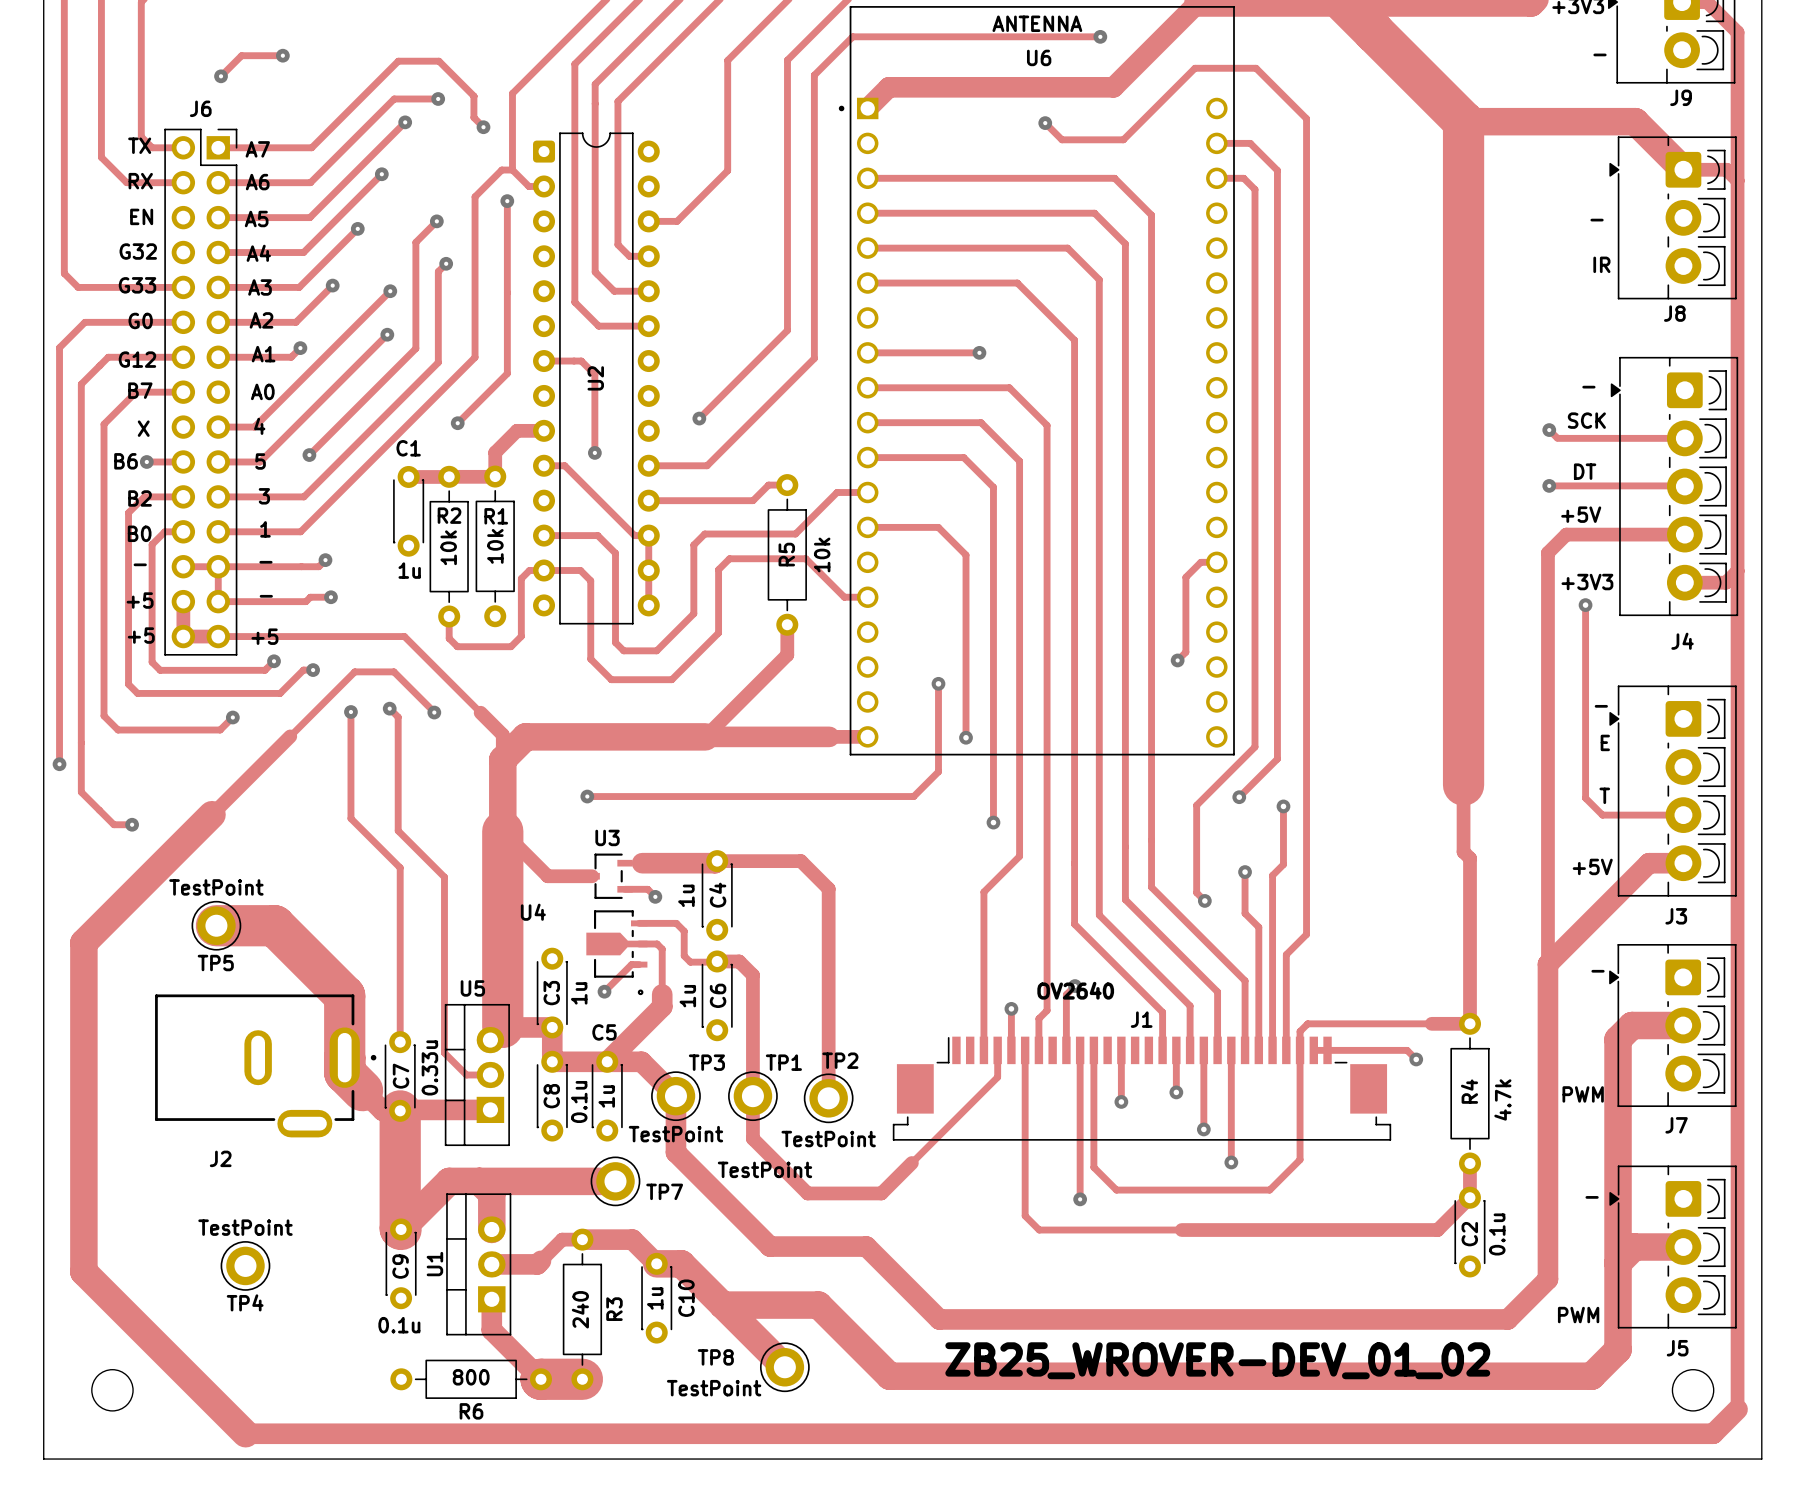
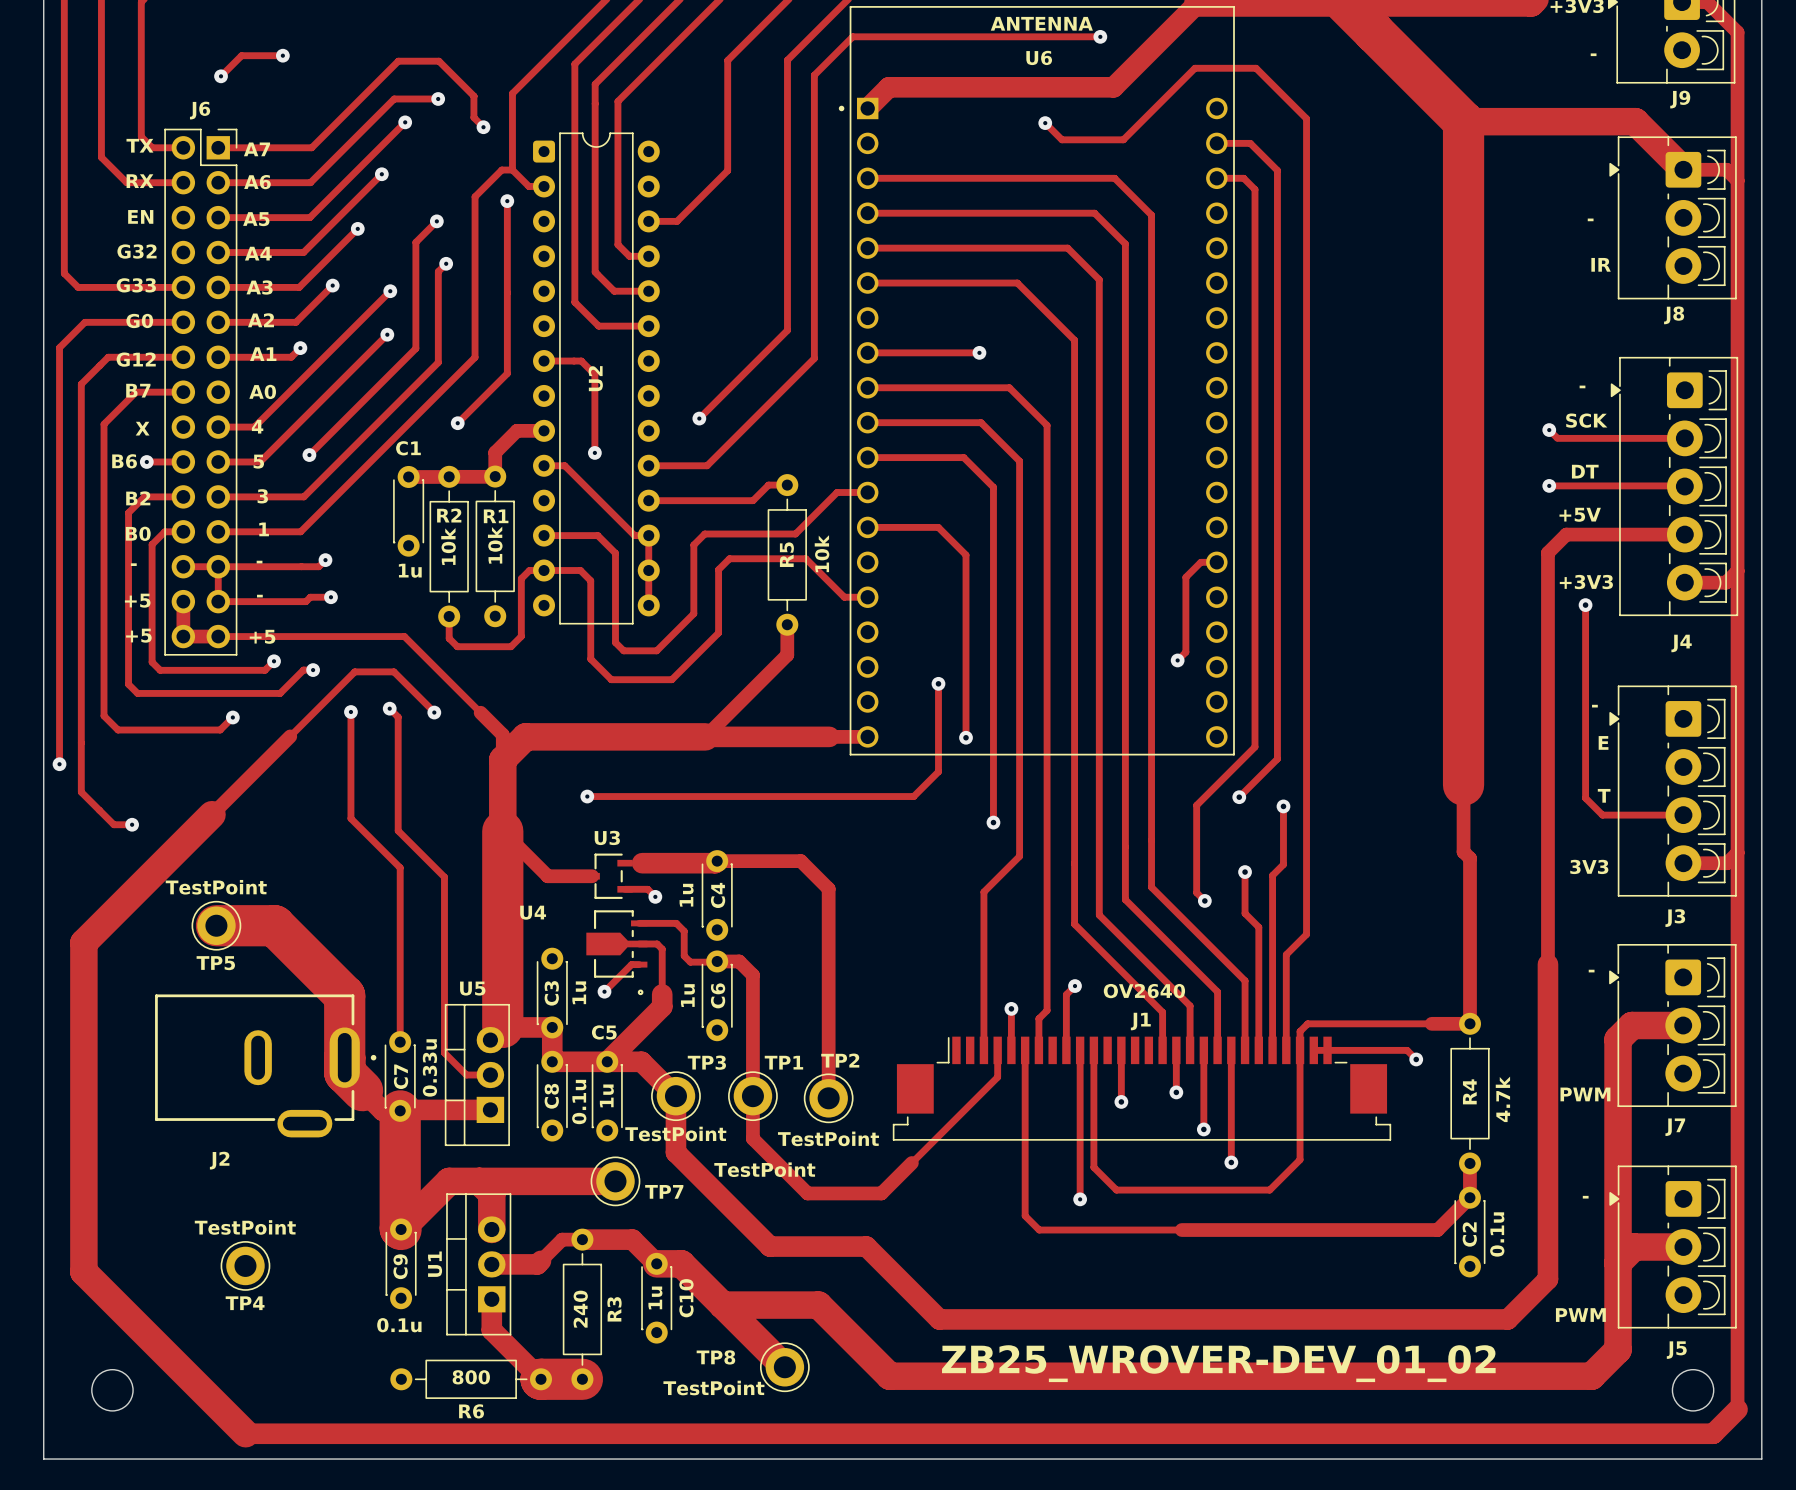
track: (1683, 863) (1649, 863) (1547, 964) -> (1683, 863) (1727, 863) (1737, 852)
text: +5V (1592, 866) -> 3V3 (1589, 866)
text position: OV2640 (1075, 990) -> OV2640 (1144, 991)

